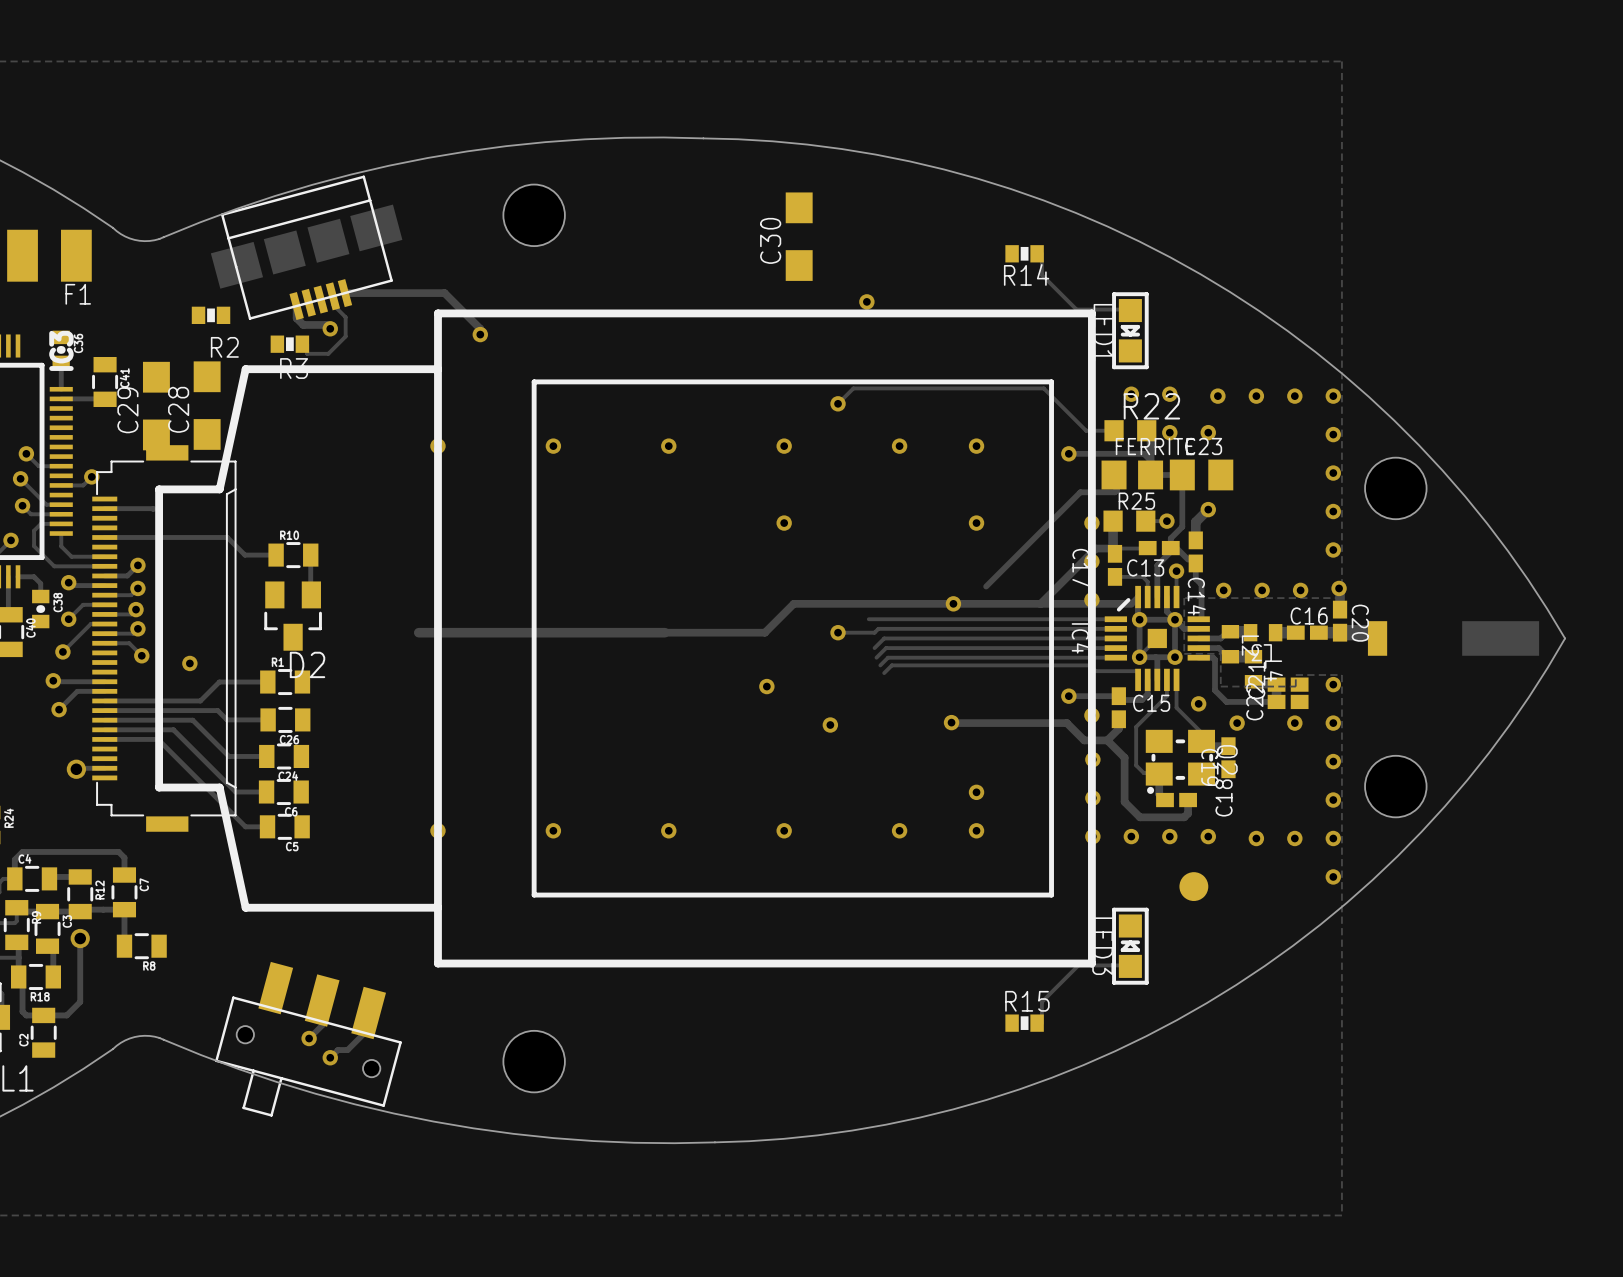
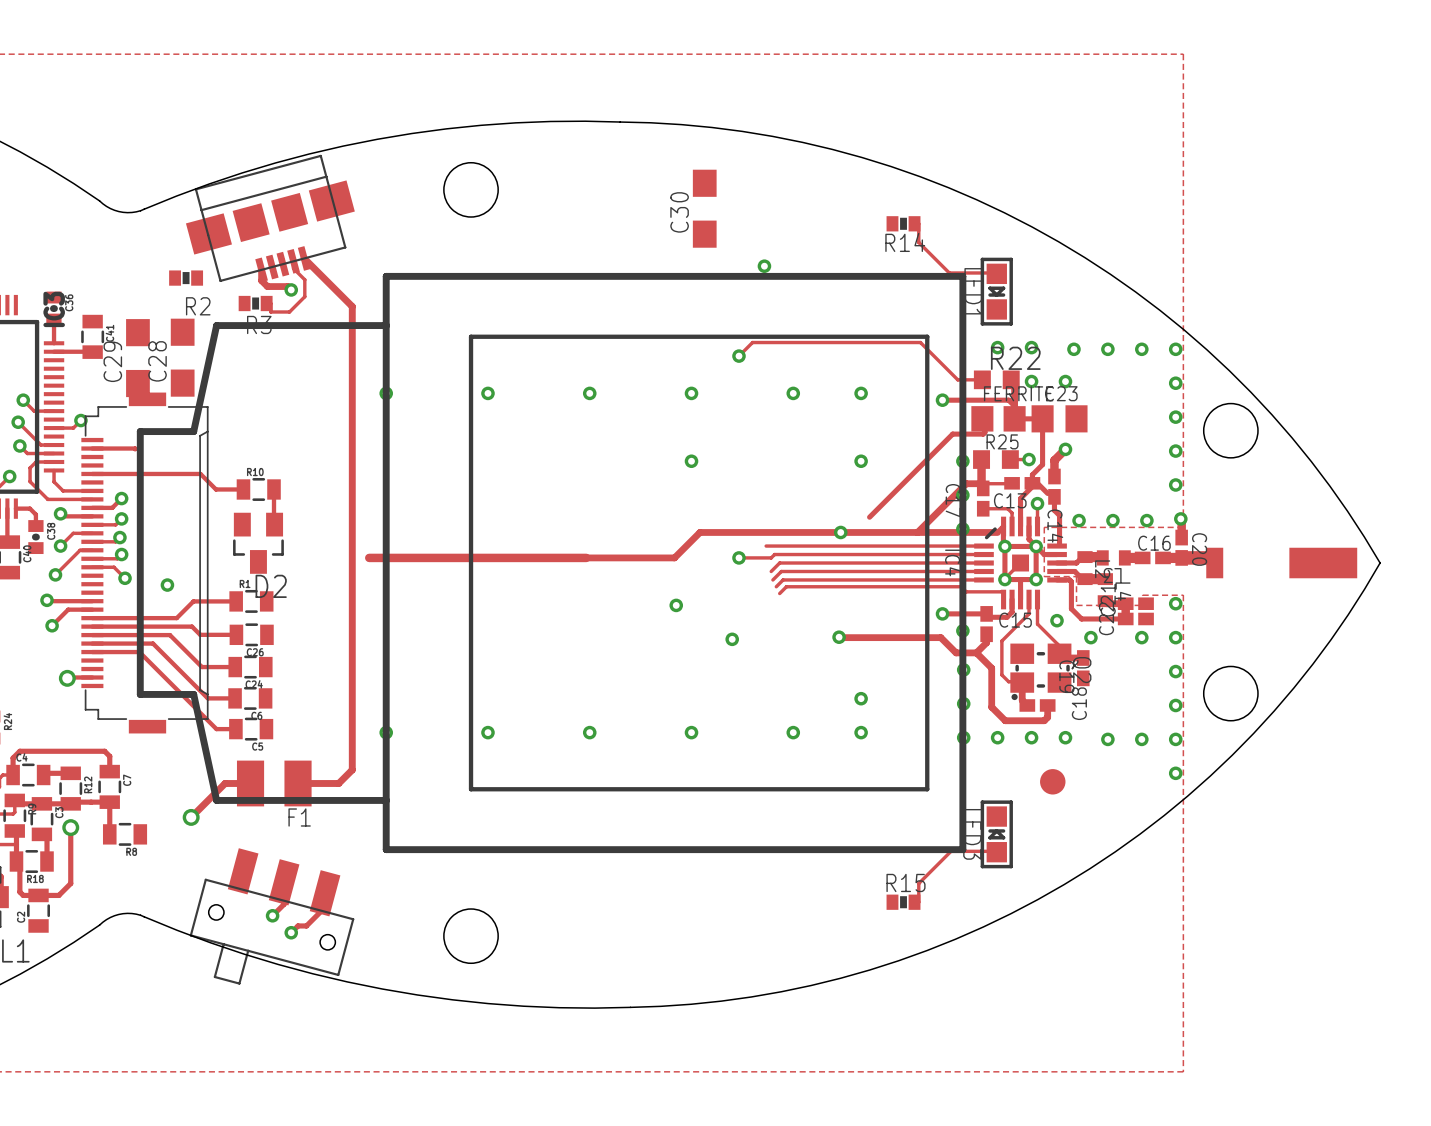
F1 position: (49, 255) -> (274, 783)
track: (344, 293) (444, 293) (480, 328) (480, 334) -> (304, 258) (352, 306) (352, 769) (338, 783) (298, 783)
via: (480, 334) -> none
track: none -> (250, 783) (225, 783) (191, 817)
via: none -> (191, 817)

